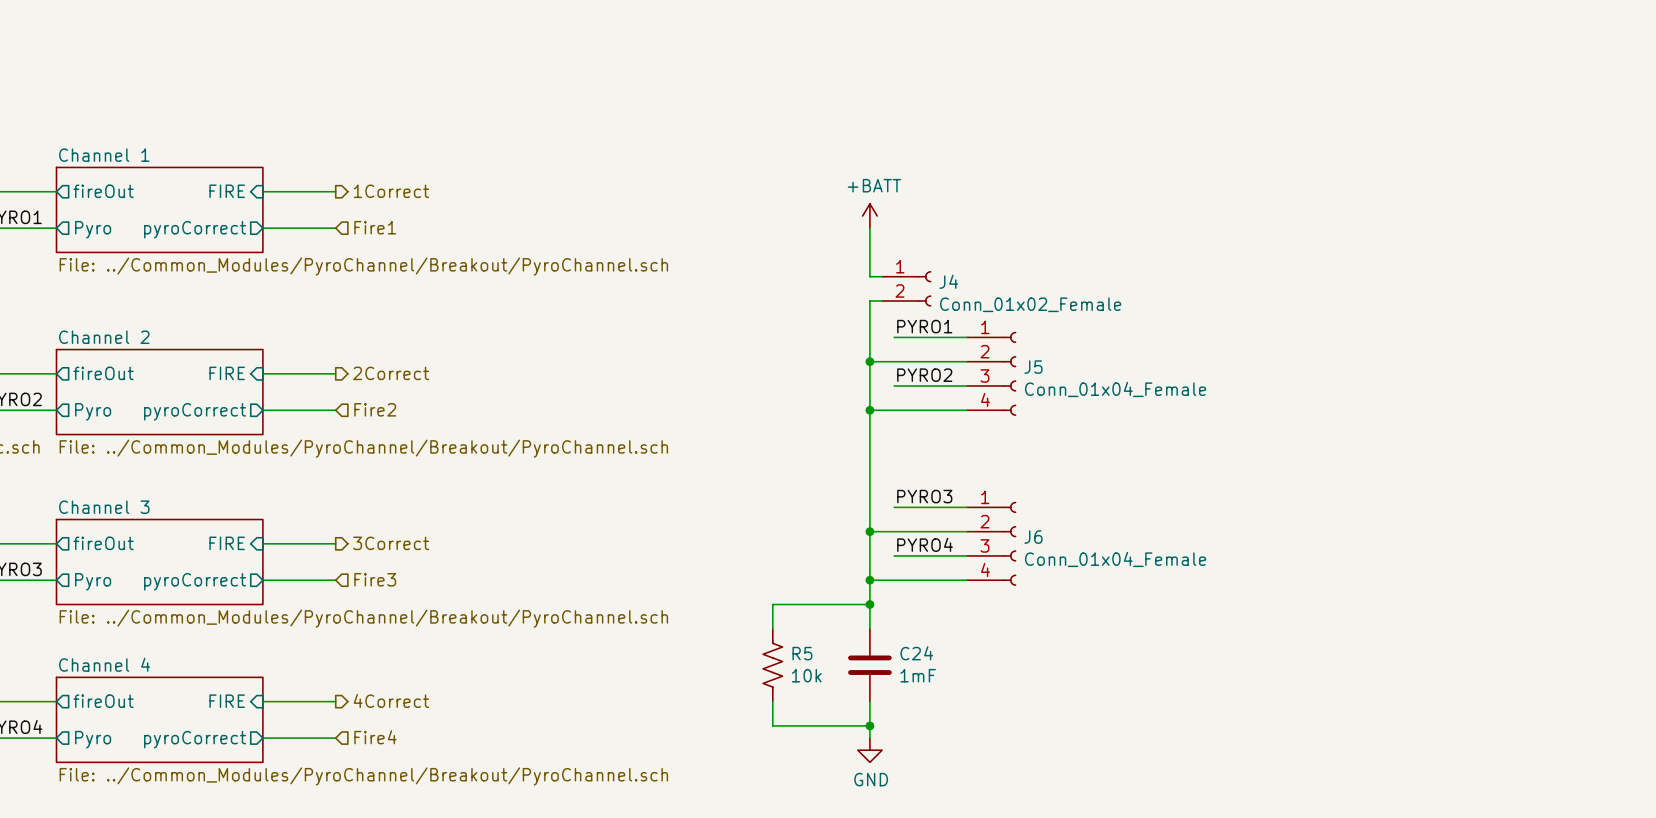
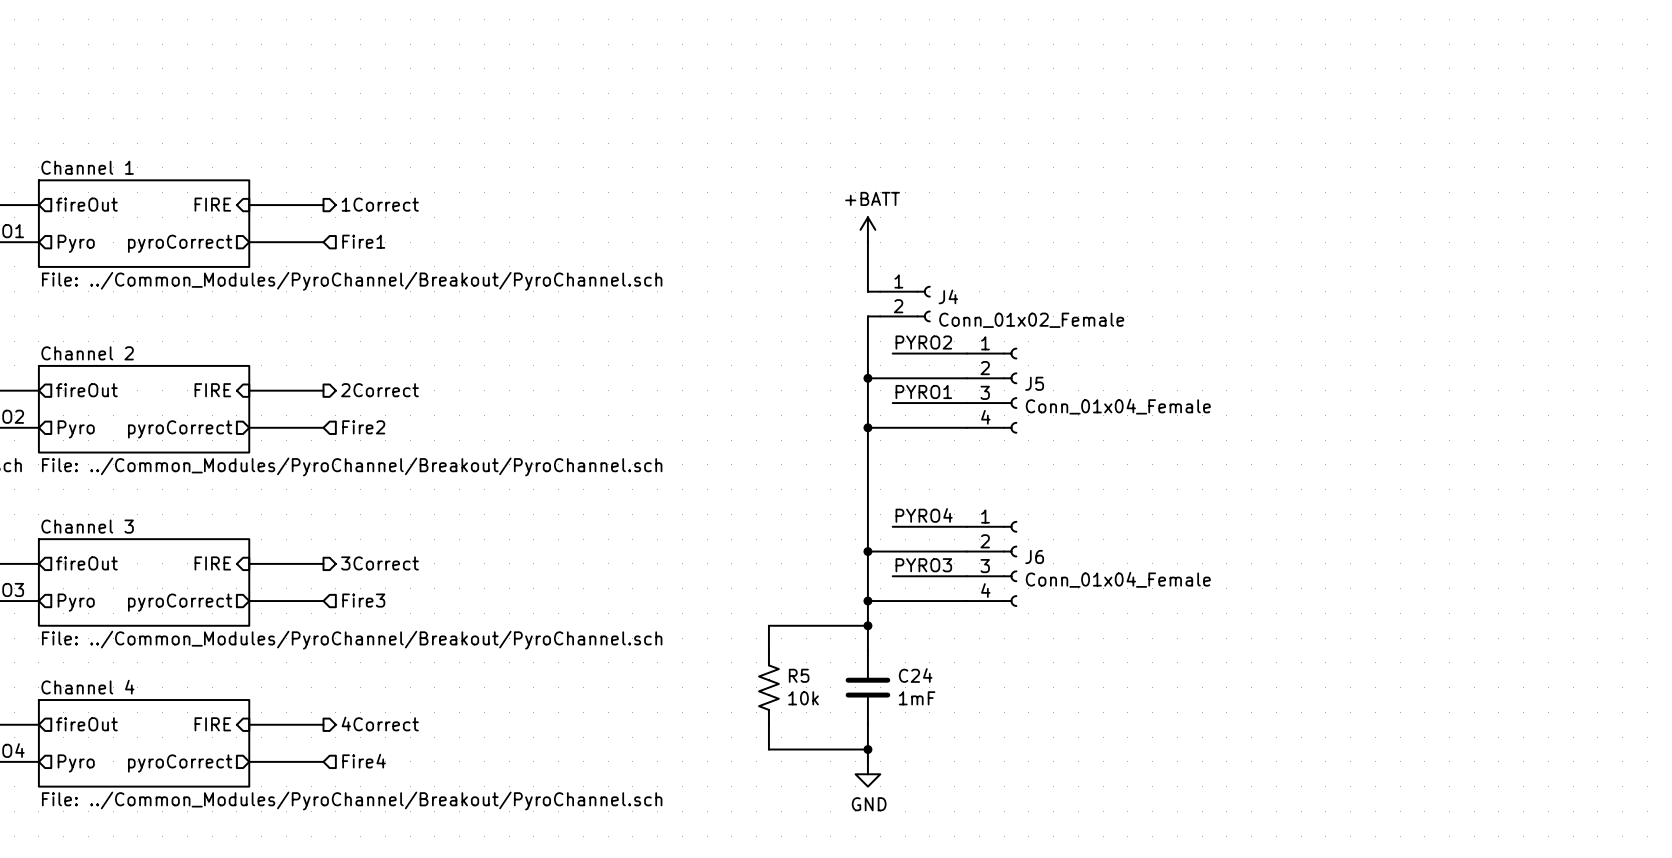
label: PYRO1 (924, 326) -> PYRO2 (923, 342)
label: PYRO2 (924, 375) -> PYRO1 (923, 392)
label: PYRO3 (924, 496) -> PYRO4 (924, 515)
label: PYRO4 (925, 544) -> PYRO3 (923, 565)

